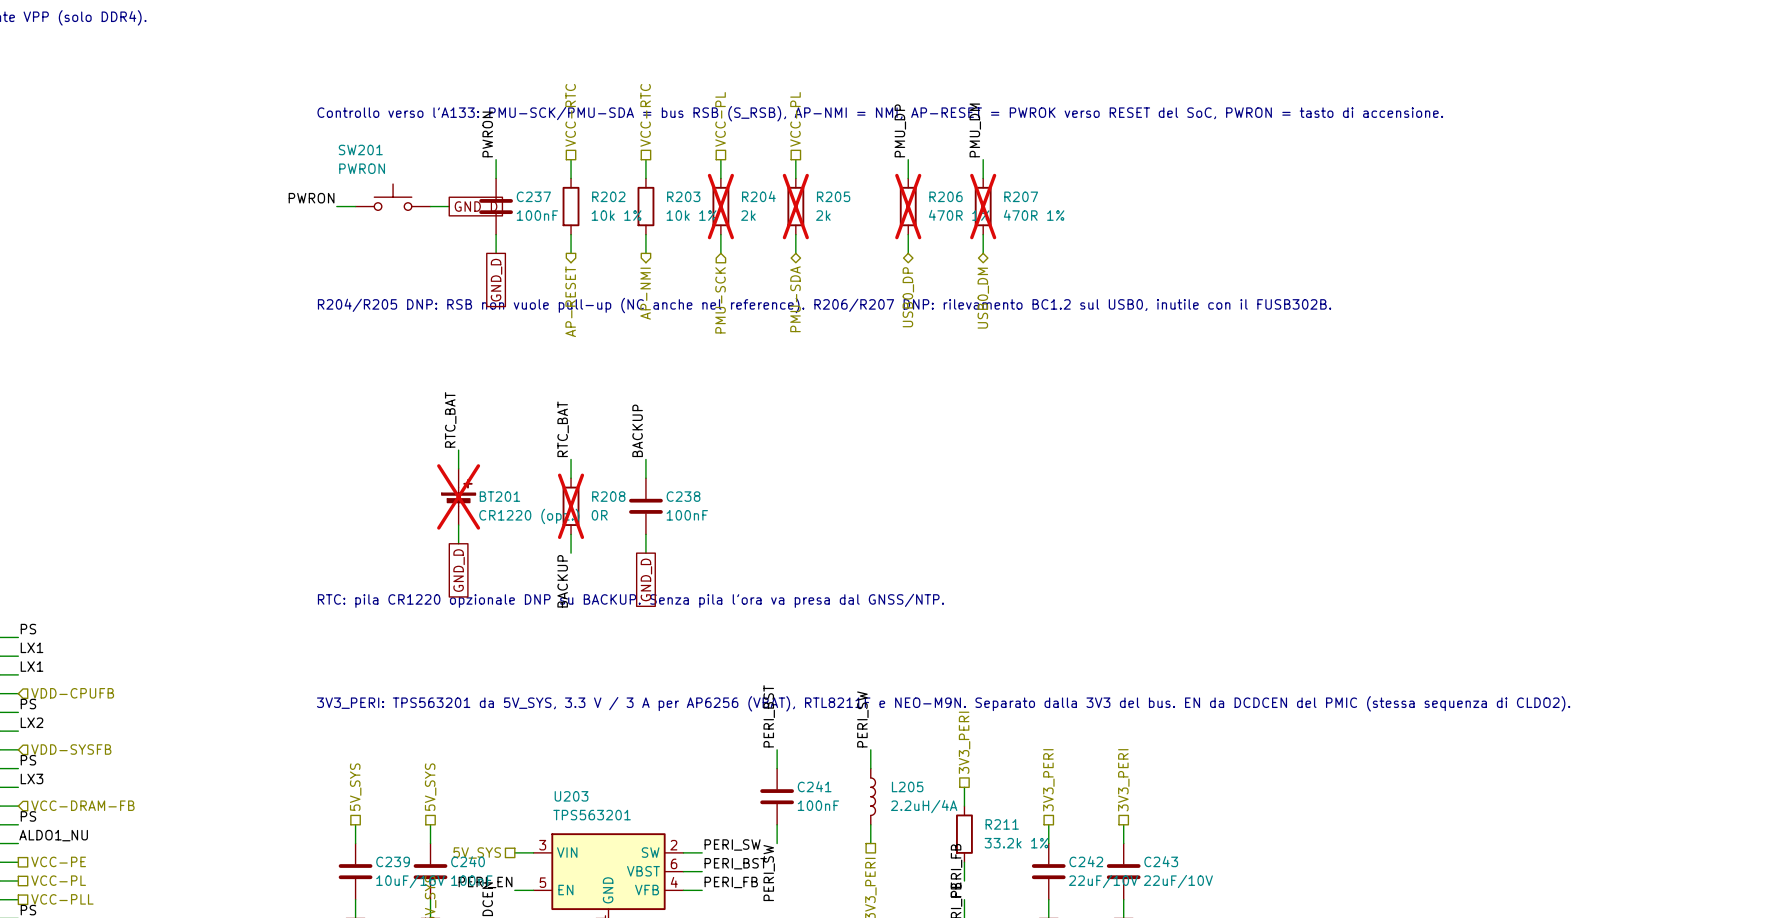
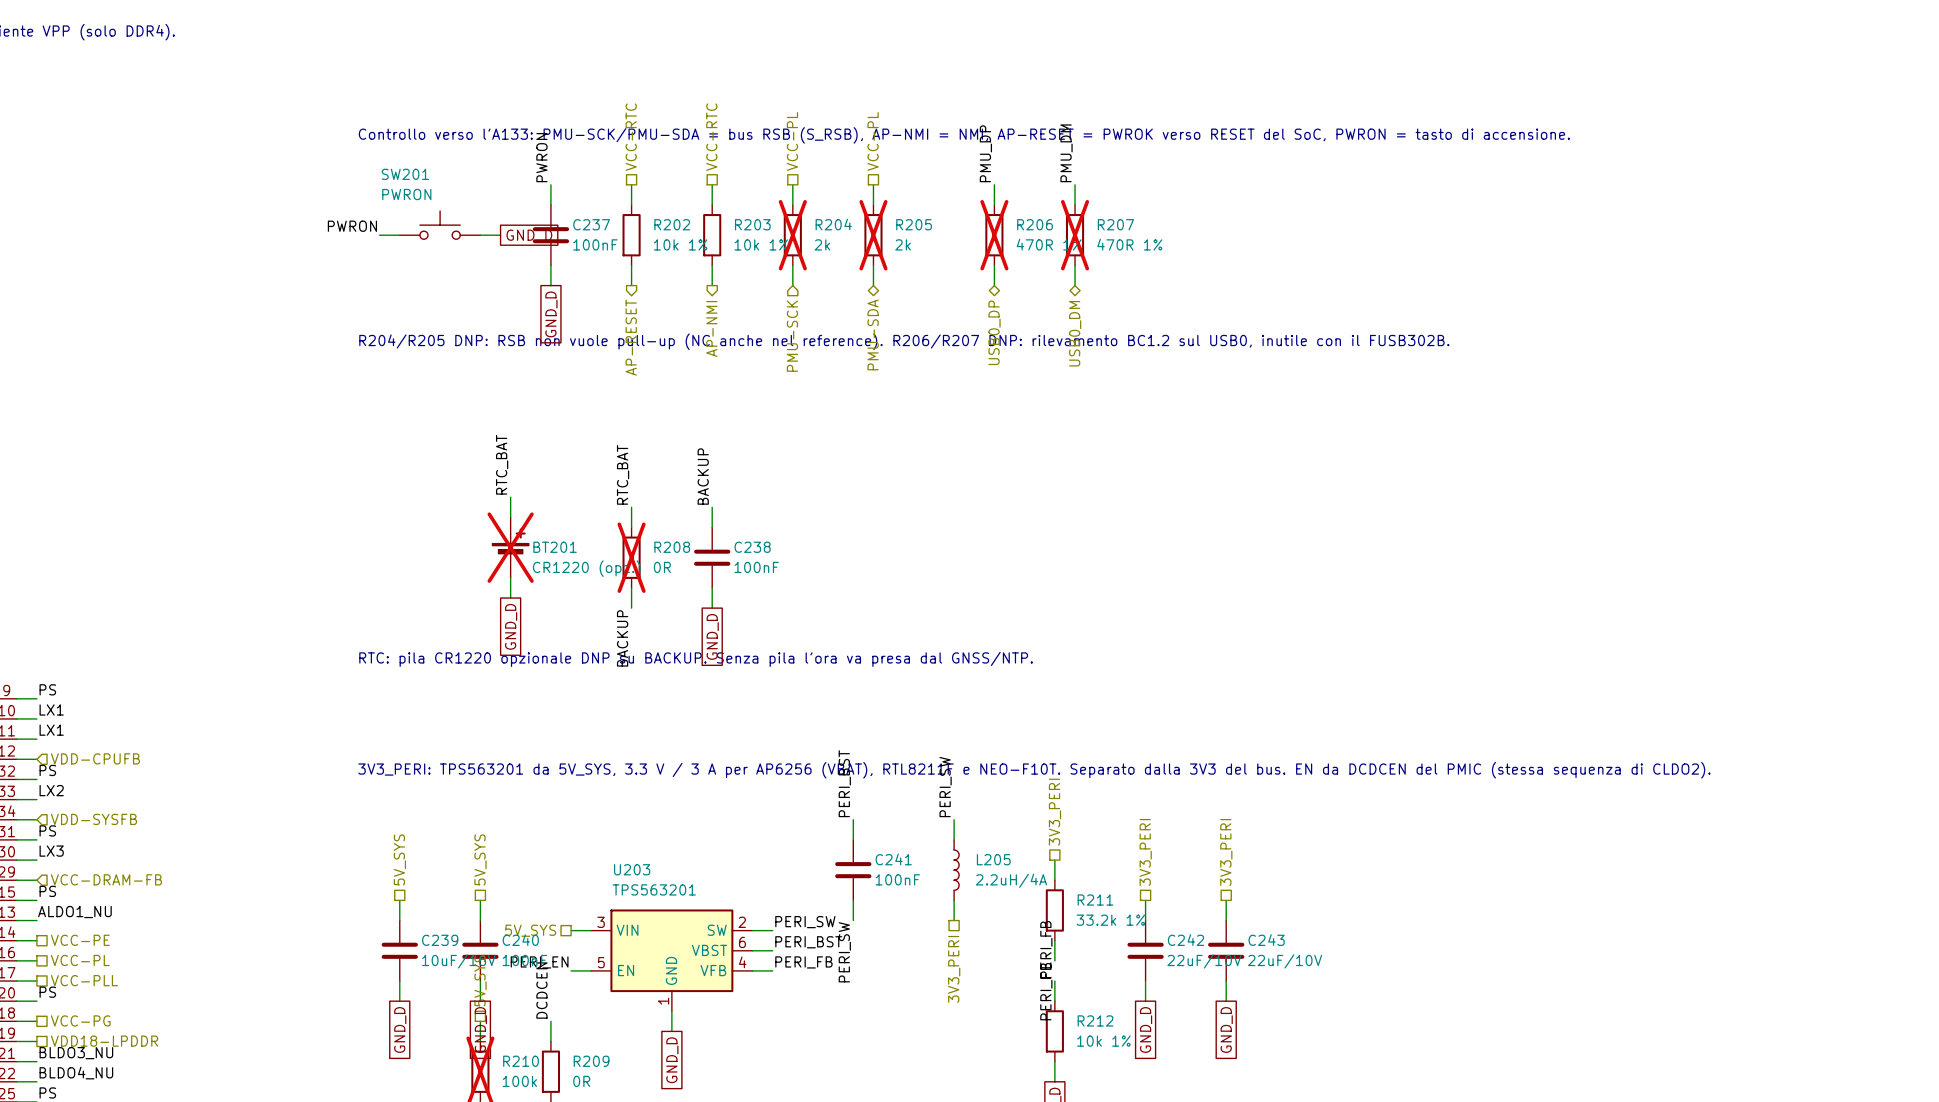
text: 3V3_PERI: TPS563201 da 5V_SYS, 3.3 V / 3 A per AP6256 (VBAT), RTL8211F e NEO-M9N. Separato dalla 3V3 del bus. EN da DCDCEN del PMIC (stessa sequenza di CLDO2). (943, 703) -> 3V3_PERI: TPS563201 da 5V_SYS, 3.3 V / 3 A per AP6256 (VBAT), RTL8211F e NEO-F10T. Separato dalla 3V3 del bus. EN da DCDCEN del PMIC (stessa sequenza di CLDO2). (1034, 770)

